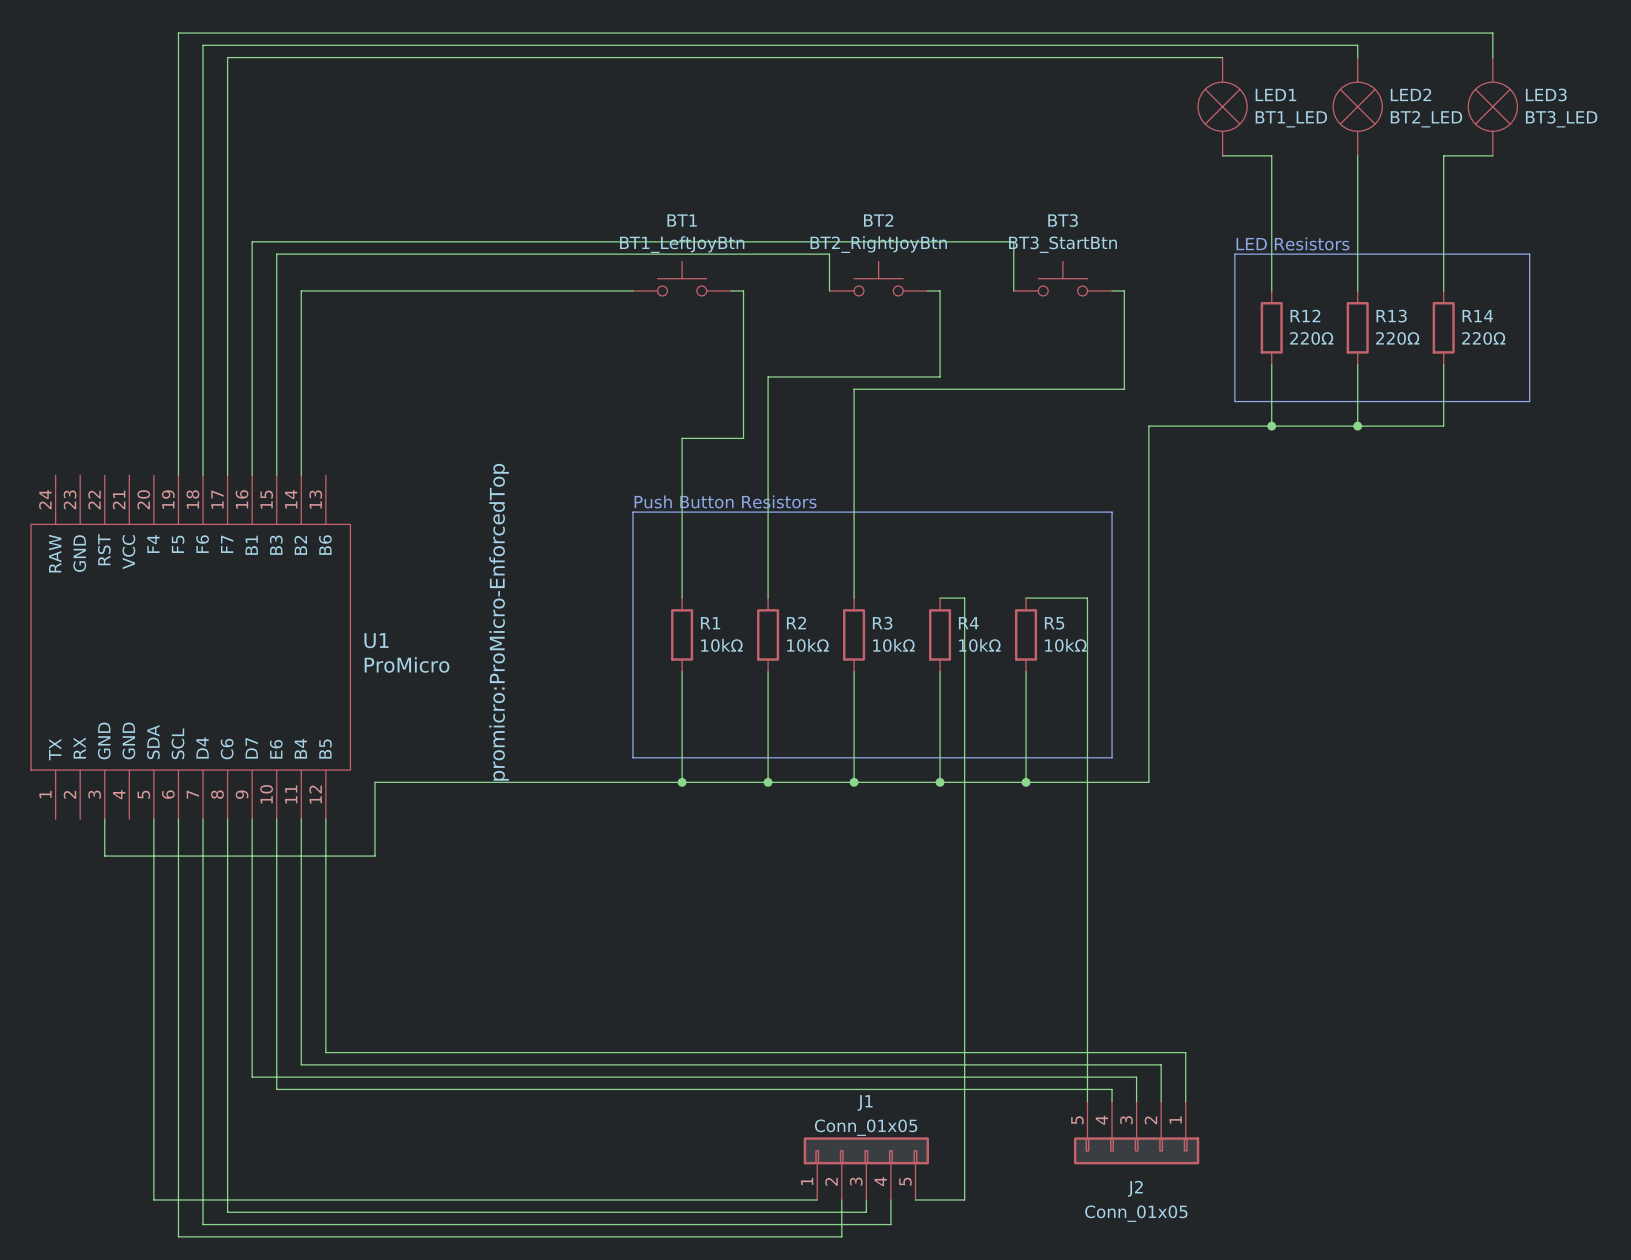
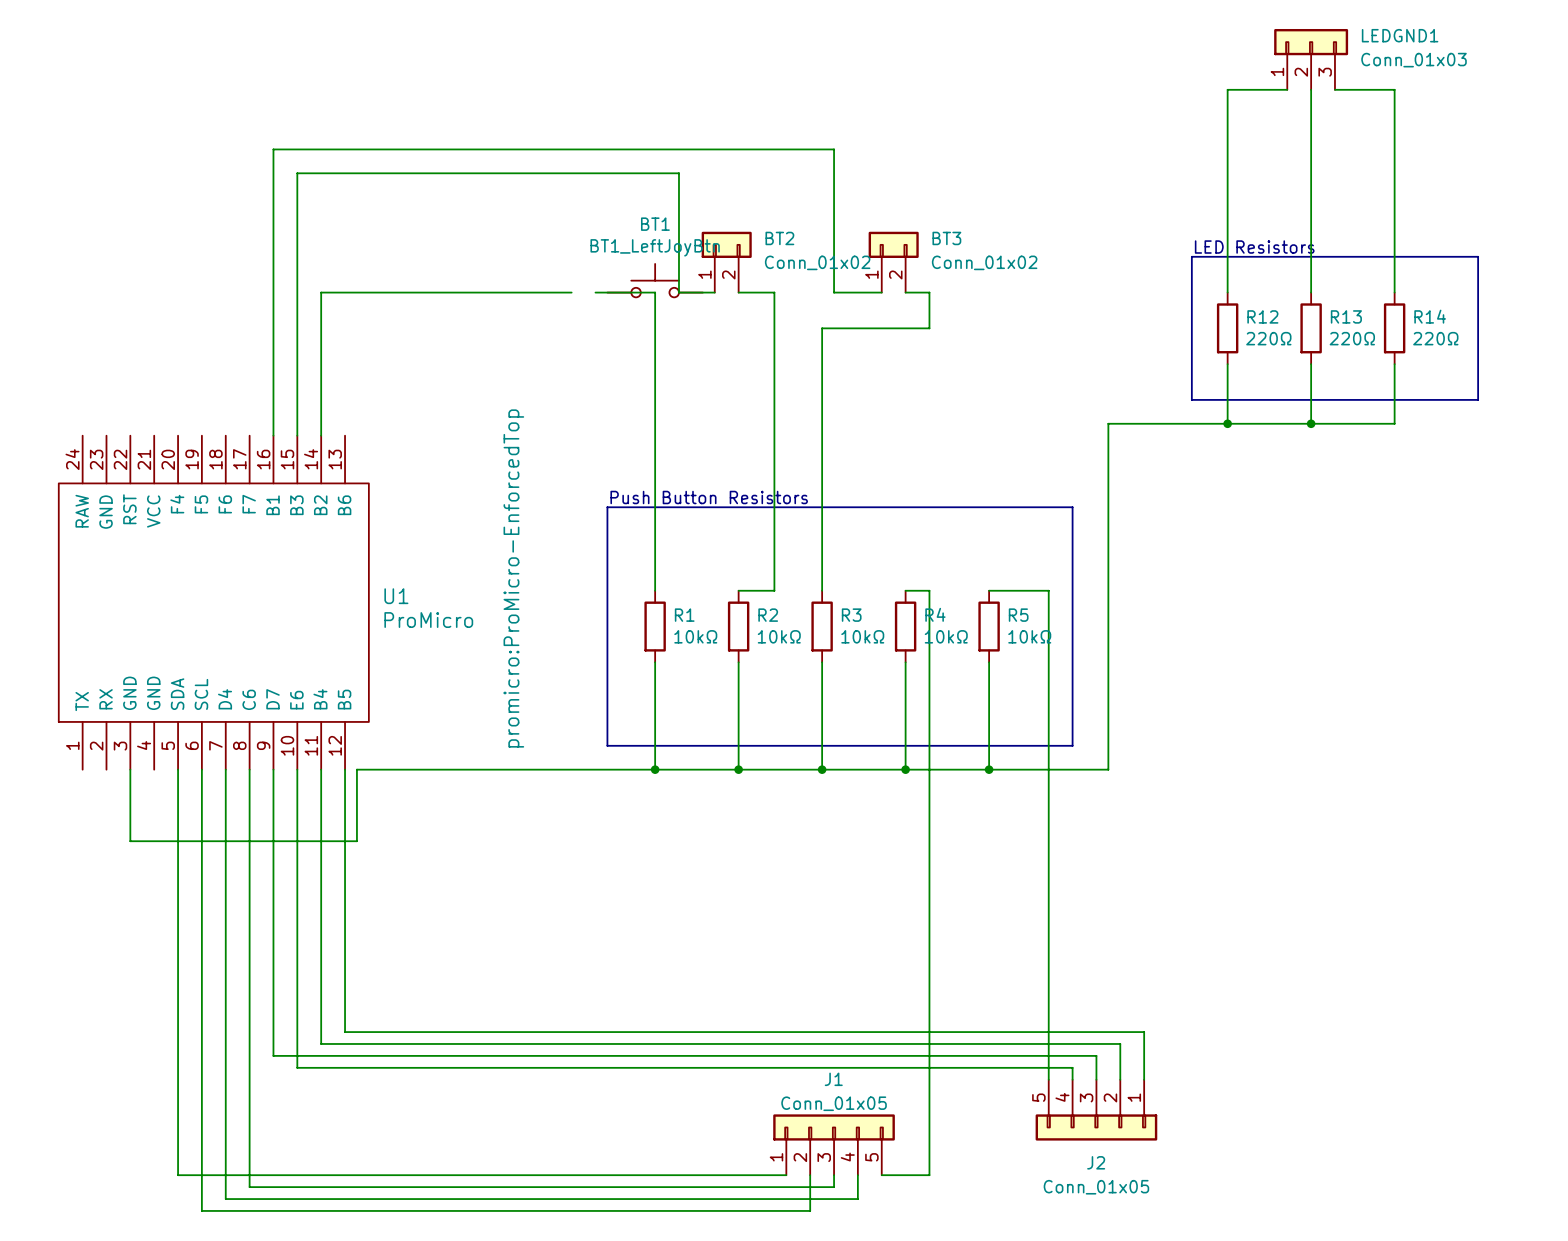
LEDGND1: none -> Conn_01x03 (1311, 59)
wire: (1222, 57) (227, 57) (227, 475) -> none
wire: (1357, 57) (1357, 45) (203, 45) (203, 475) -> none
wire: (1492, 57) (1492, 33) (178, 33) (178, 475) -> none
wire: none -> (1311, 89) (1311, 161)
LED1: BT1_LED (1222, 106) -> none
LED2: BT2_LED (1357, 106) -> none
LED3: BT3_LED (1492, 106) -> none
wire: (1222, 155) (1271, 155) -> (1287, 89) (1227, 89) (1227, 161)
wire: (1443, 155) (1492, 155) -> (1394, 161) (1394, 89) (1334, 89)
BT2 name position: BT2 (878, 220) -> BT2 (779, 238)
BT3 name position: BT3 (1063, 220) -> BT3 (946, 238)
BT2 value: BT2_RightJoyBtn (878, 244) -> Conn_01x02 (817, 262)
BT3 value: BT3_StartBtn (1063, 244) -> Conn_01x02 (984, 262)
BT2 symbol: [829, 261, 928, 296] -> [701, 231, 752, 293]
BT3 symbol: [1013, 261, 1113, 296] -> [868, 231, 919, 293]
wire: (338, 290) (301, 290) (301, 475) -> (321, 292) (321, 435)
wire: (596, 290) (620, 290) -> none
wire: none -> (702, 292) (678, 292) (678, 173) (297, 173) (297, 435)
wire: (743, 290) (743, 438) (682, 438) -> (607, 292) (655, 292) (655, 435)
wire: (829, 290) (829, 254) (276, 254) (276, 475) -> none
wire: none -> (881, 292) (834, 292) (834, 149) (273, 149) (273, 435)
wire: (927, 290) (940, 290) (940, 376) (768, 376) (768, 598) -> (738, 292) (774, 292) (774, 590) (738, 590)
wire: (1013, 290) (1013, 241) (252, 241) (252, 475) -> none
wire: (1112, 290) (1124, 290) (1124, 389) (854, 389) -> (905, 292) (929, 292) (929, 328) (822, 328) (822, 387)
U1 position: (190, 647) -> (213, 602)
wire: (104, 819) (104, 856) (141, 856) -> (130, 769) (130, 841)
wire: (153, 819) (153, 1199) (190, 1199) -> (178, 769) (178, 1175)
wire: (178, 819) (178, 1236) (215, 1236) -> (201, 769) (201, 1210)
wire: (203, 819) (203, 1224) (239, 1224) -> (225, 769) (225, 1199)
wire: (227, 819) (227, 1212) (264, 1212) -> (249, 769) (249, 1187)
wire: (252, 819) (252, 1077) (289, 1077) -> (273, 769) (273, 1055)
wire: (276, 819) (276, 1089) (313, 1089) -> (297, 769) (297, 1067)
wire: (301, 819) (301, 1064) (338, 1064) -> (321, 769) (321, 1043)
wire: (325, 819) (325, 1052) (362, 1052) -> (345, 769) (345, 1032)

